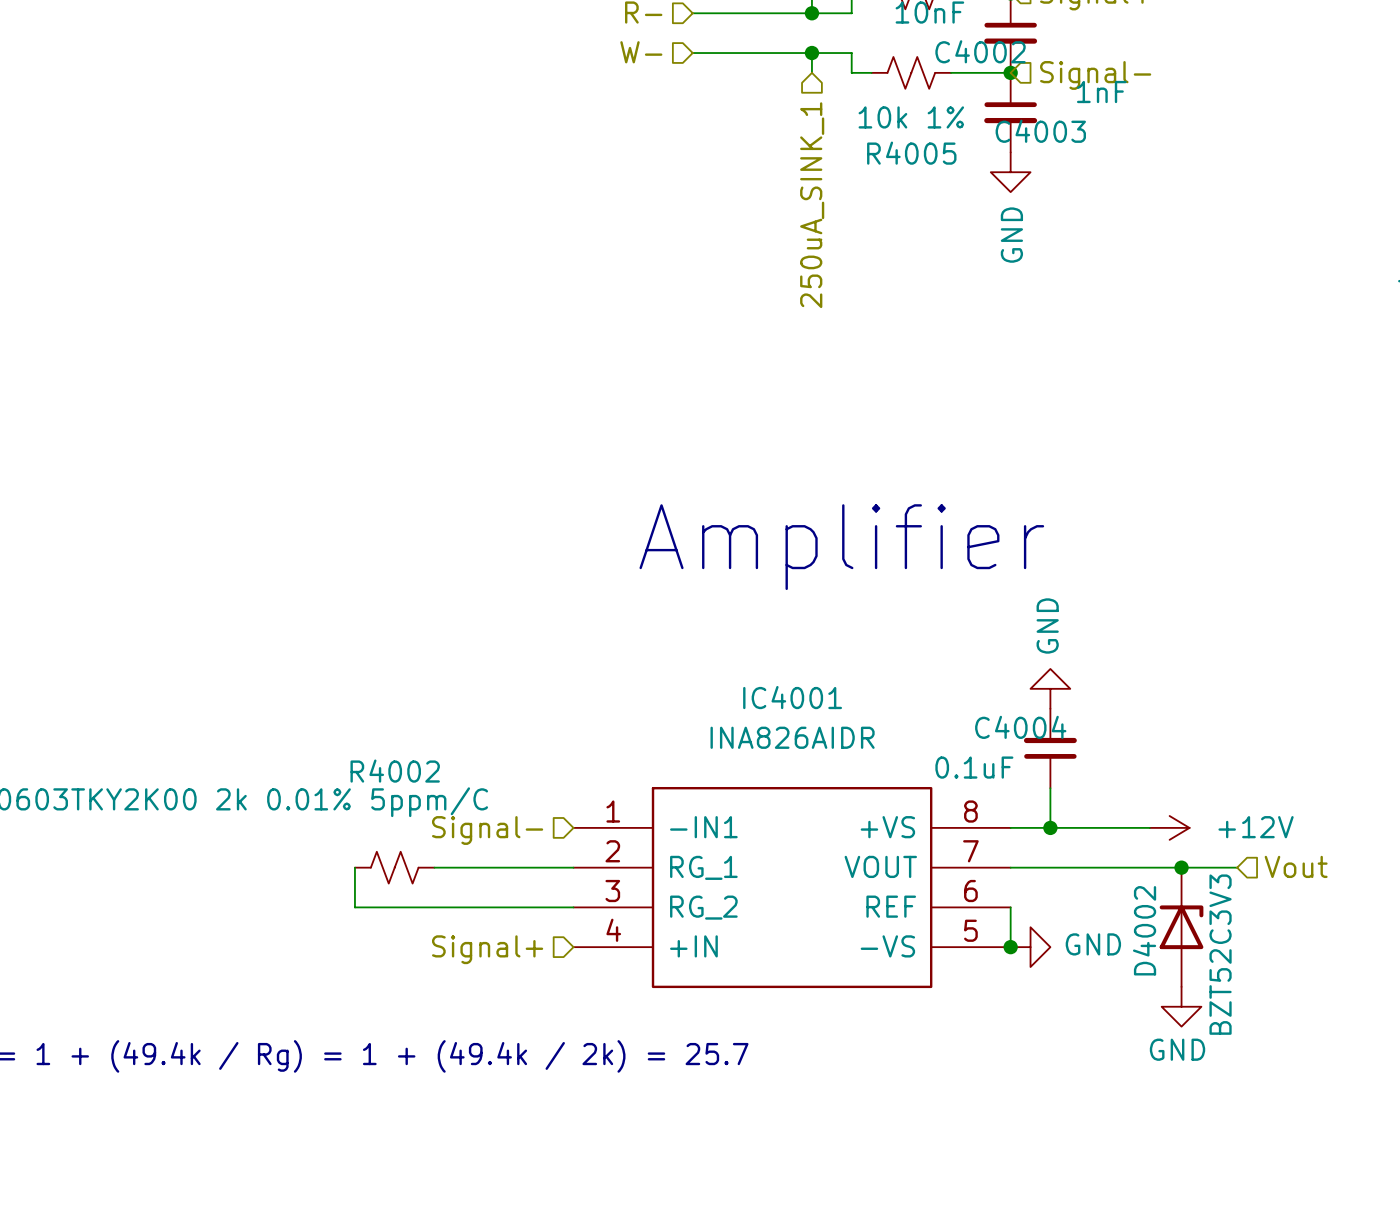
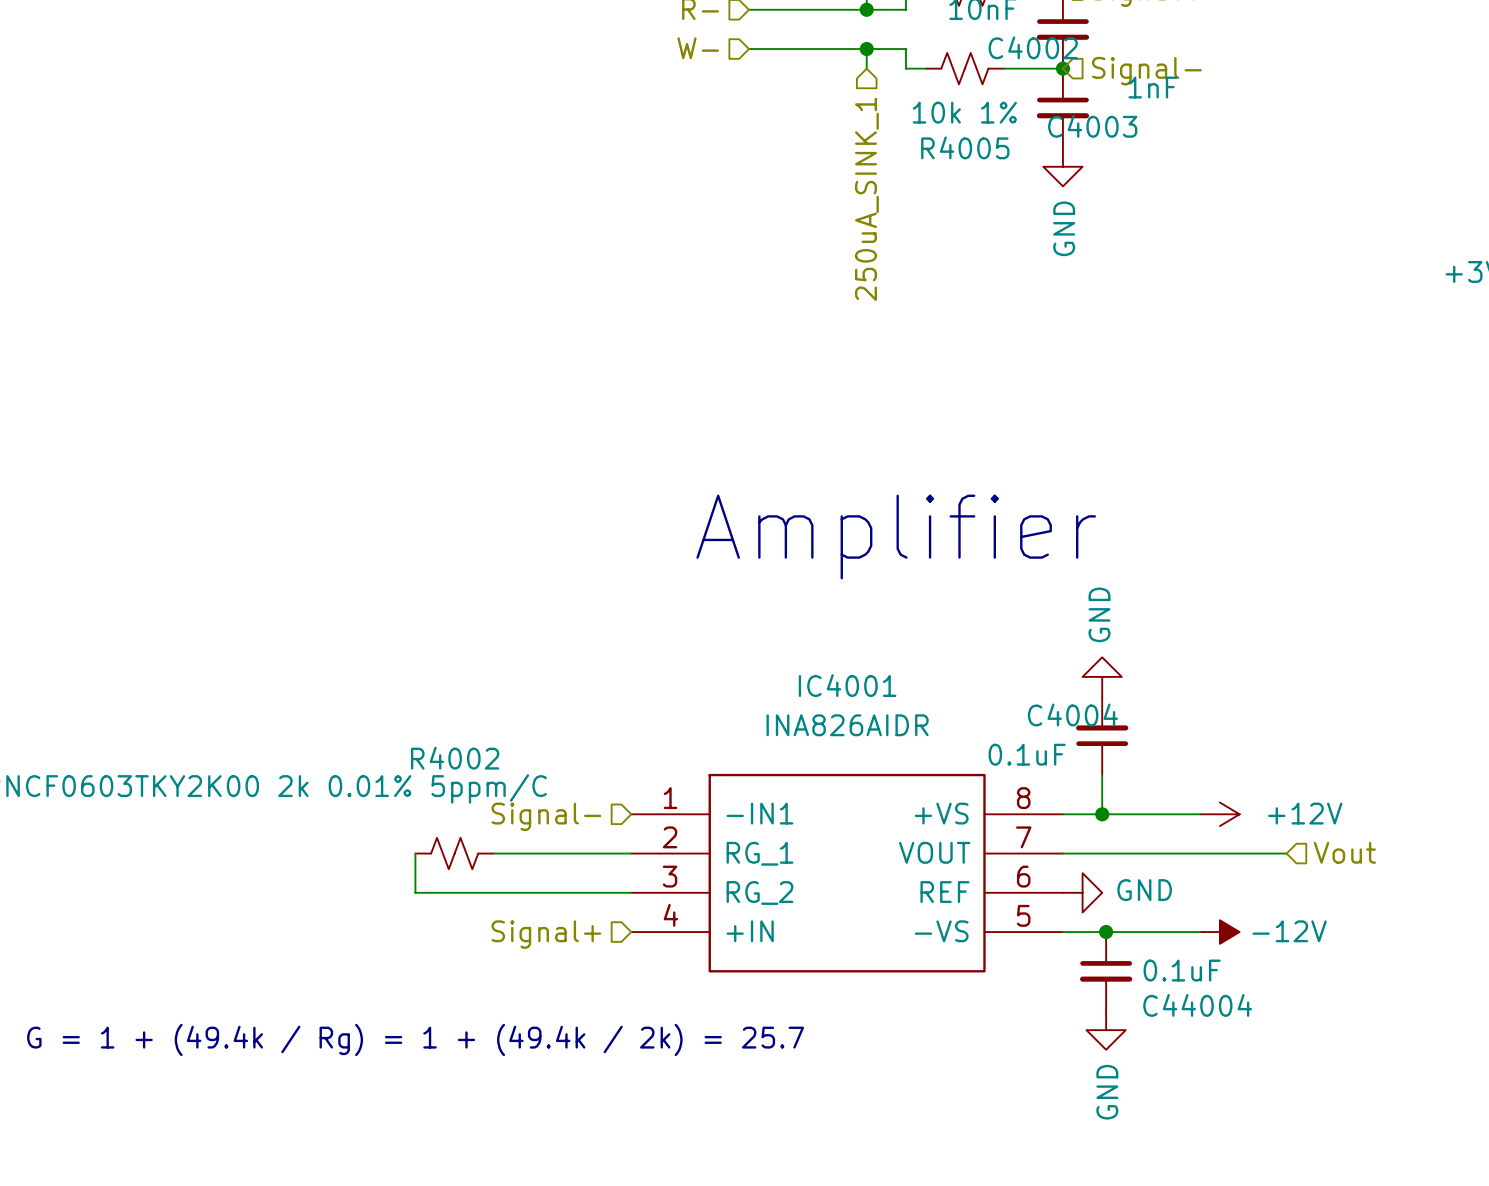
junction: (1181, 867) -> none
wire: (1010, 907) (1010, 947) -> (1200, 932) (1062, 932)
D4002: BZT52C3V3 (1181, 927) -> none
junction position: (1010, 947) -> (1106, 932)
power symbol position: GND (1030, 947) -> GND (1082, 892)
power symbol: none -> -12V (1219, 932)
C44004: none -> 0.1uF (1106, 971)
power symbol: GND (1181, 1006) -> none
power symbol: none -> GND (1106, 1030)

